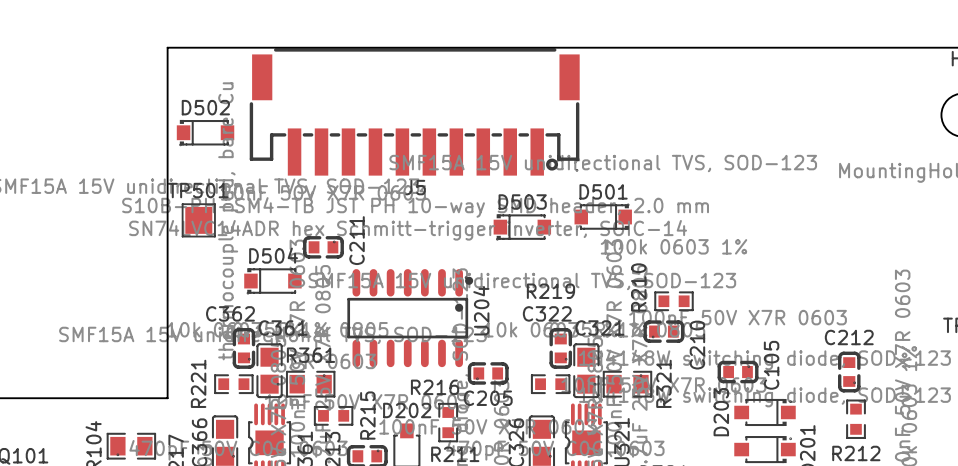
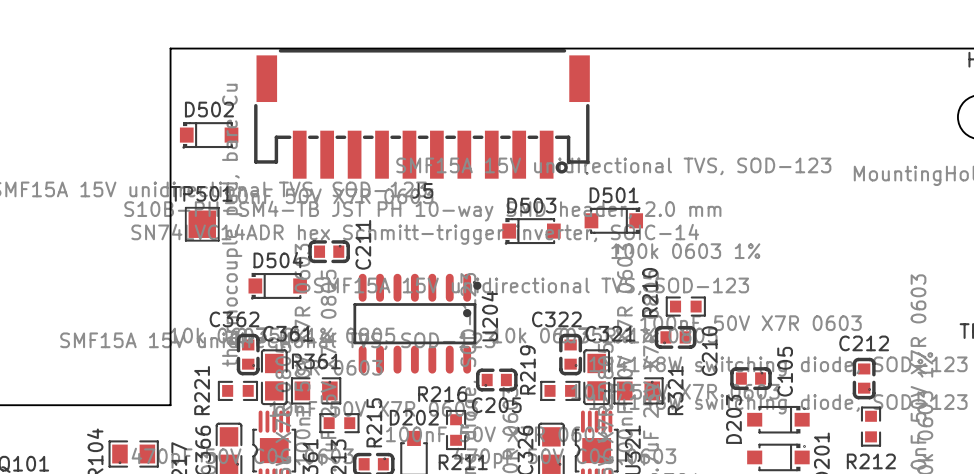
R219 name rotation: 0° (550, 291) -> 90° counterclockwise (527, 370)
R219 name position: R219 (550, 291) -> R219 (527, 370)

